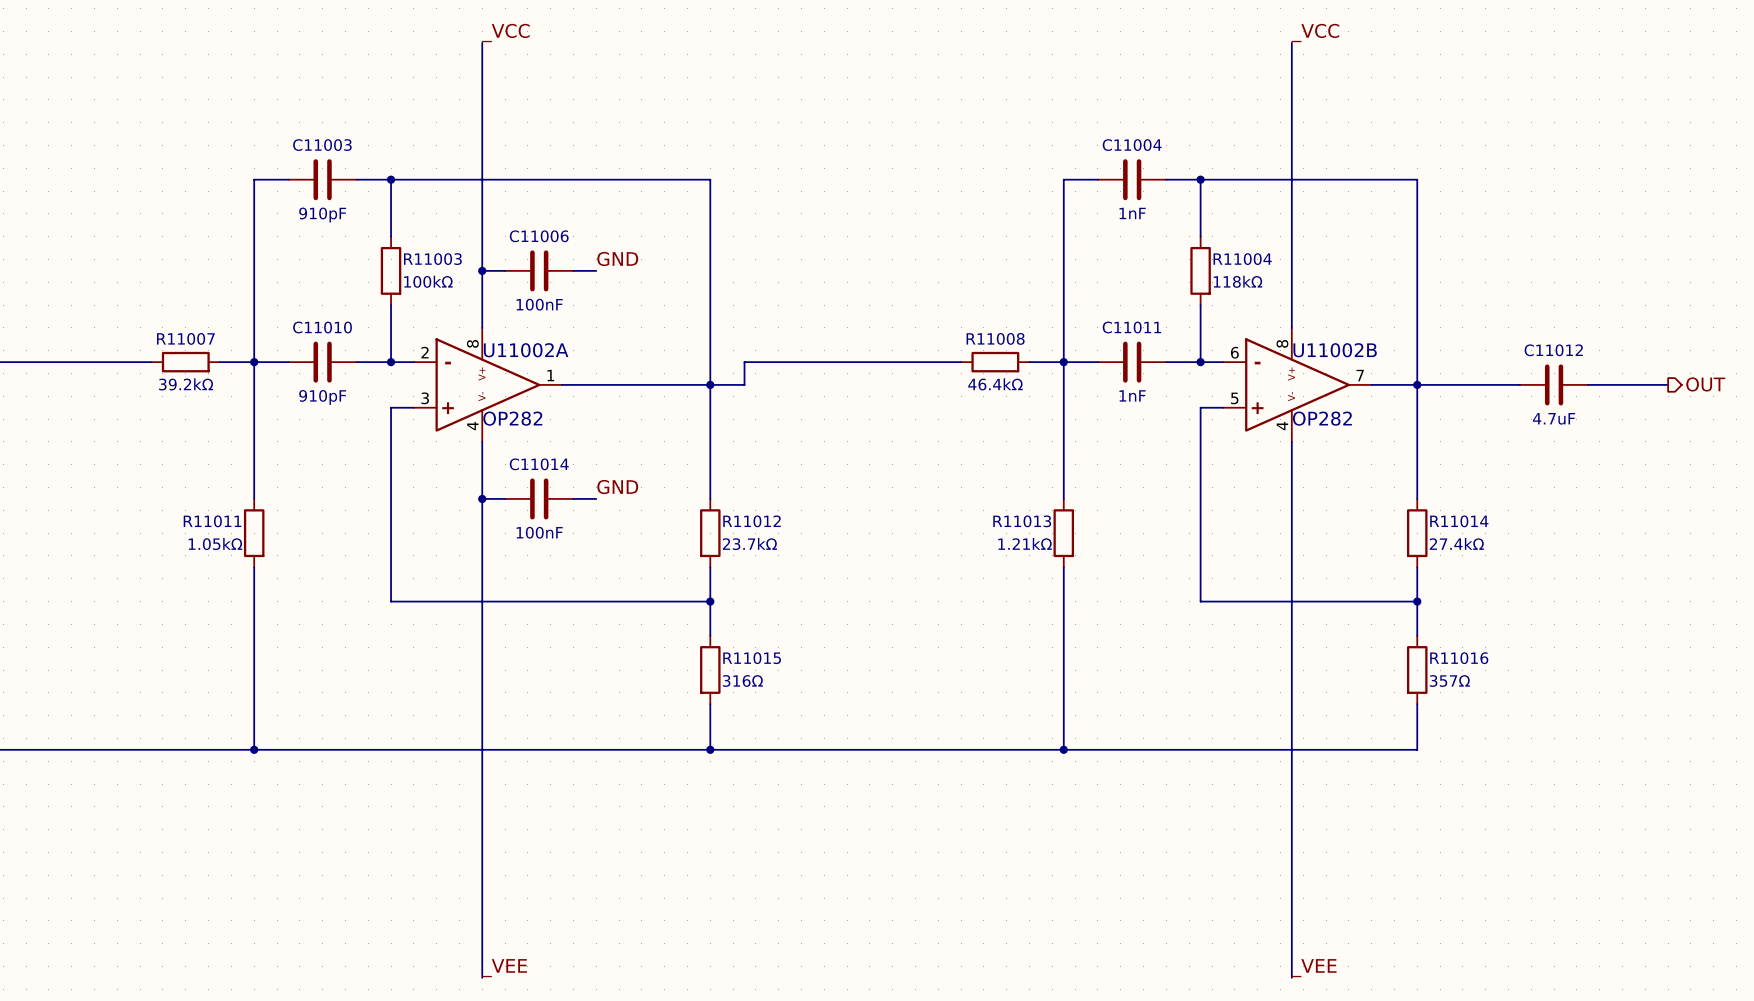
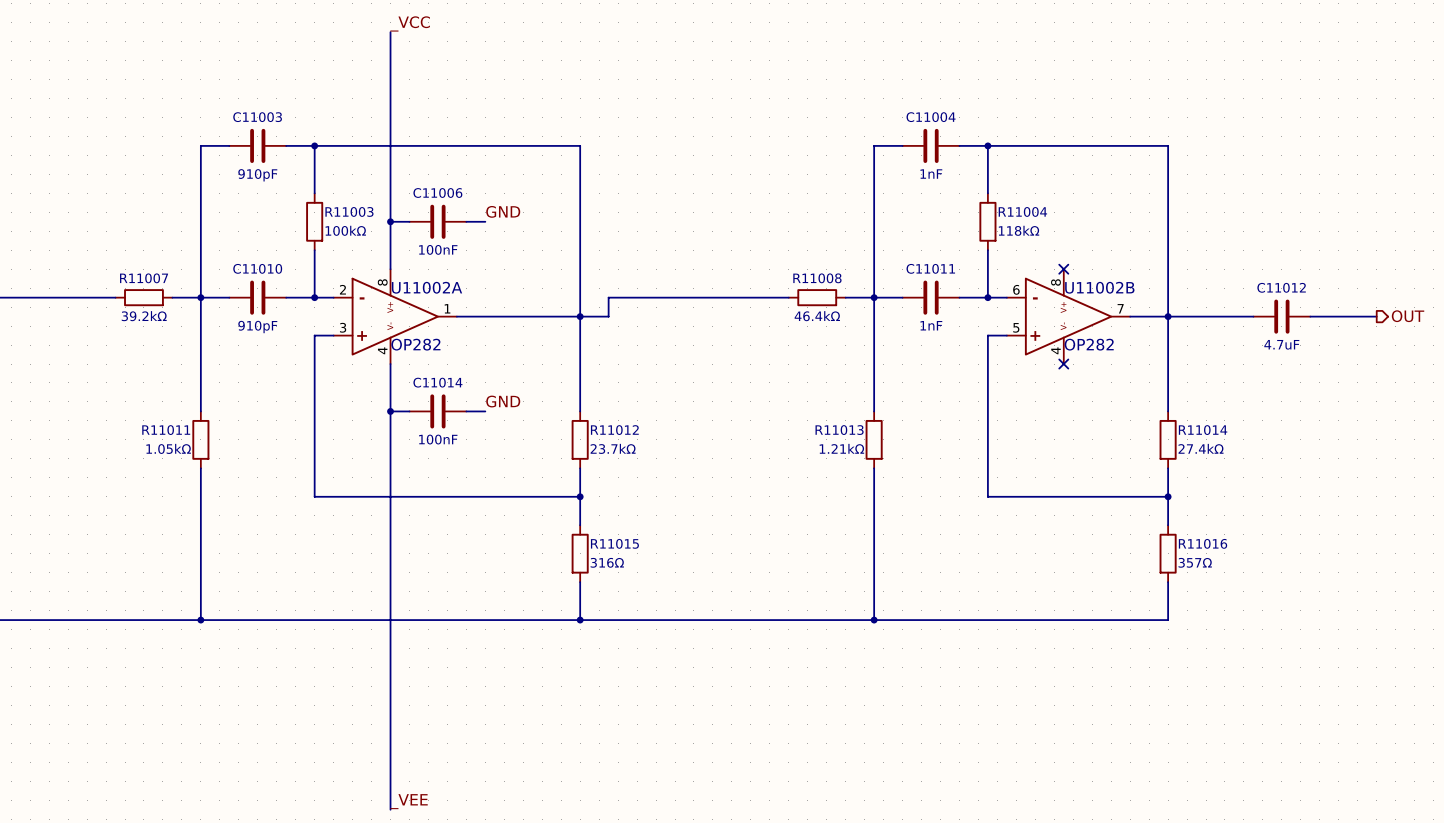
label: _VCC (1315, 33) -> none
wire: (1291, 42) (1291, 327) -> none
no-connect mark: none -> (1063, 269)
wire: (1291, 441) (1291, 977) -> none
no-connect mark: none -> (1063, 364)
label: _VEE (1314, 968) -> none

